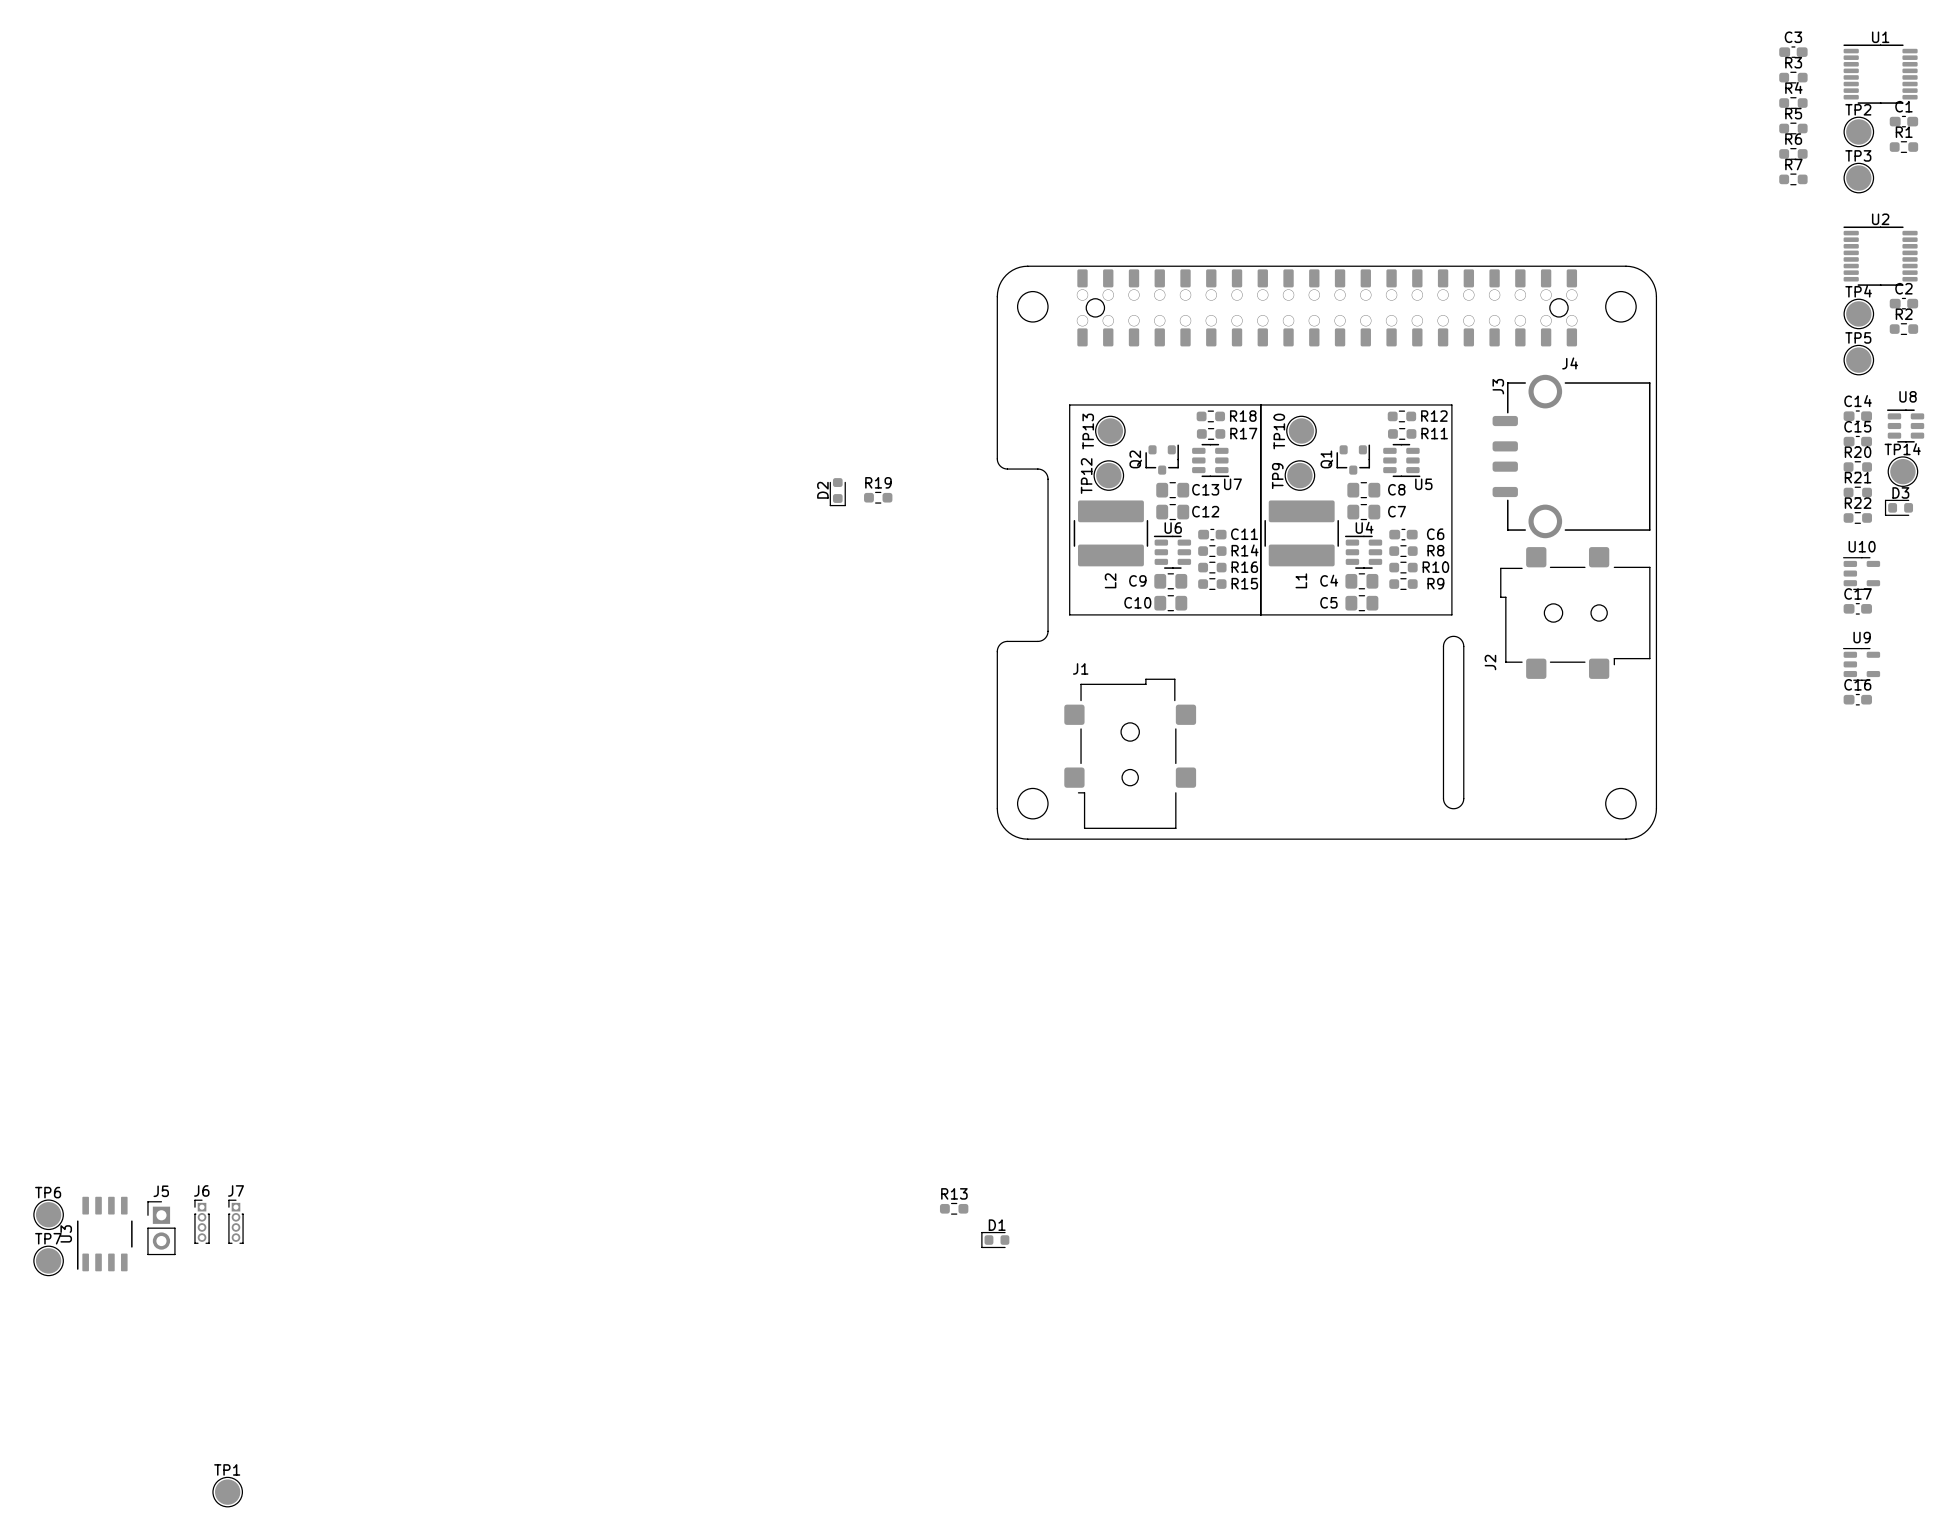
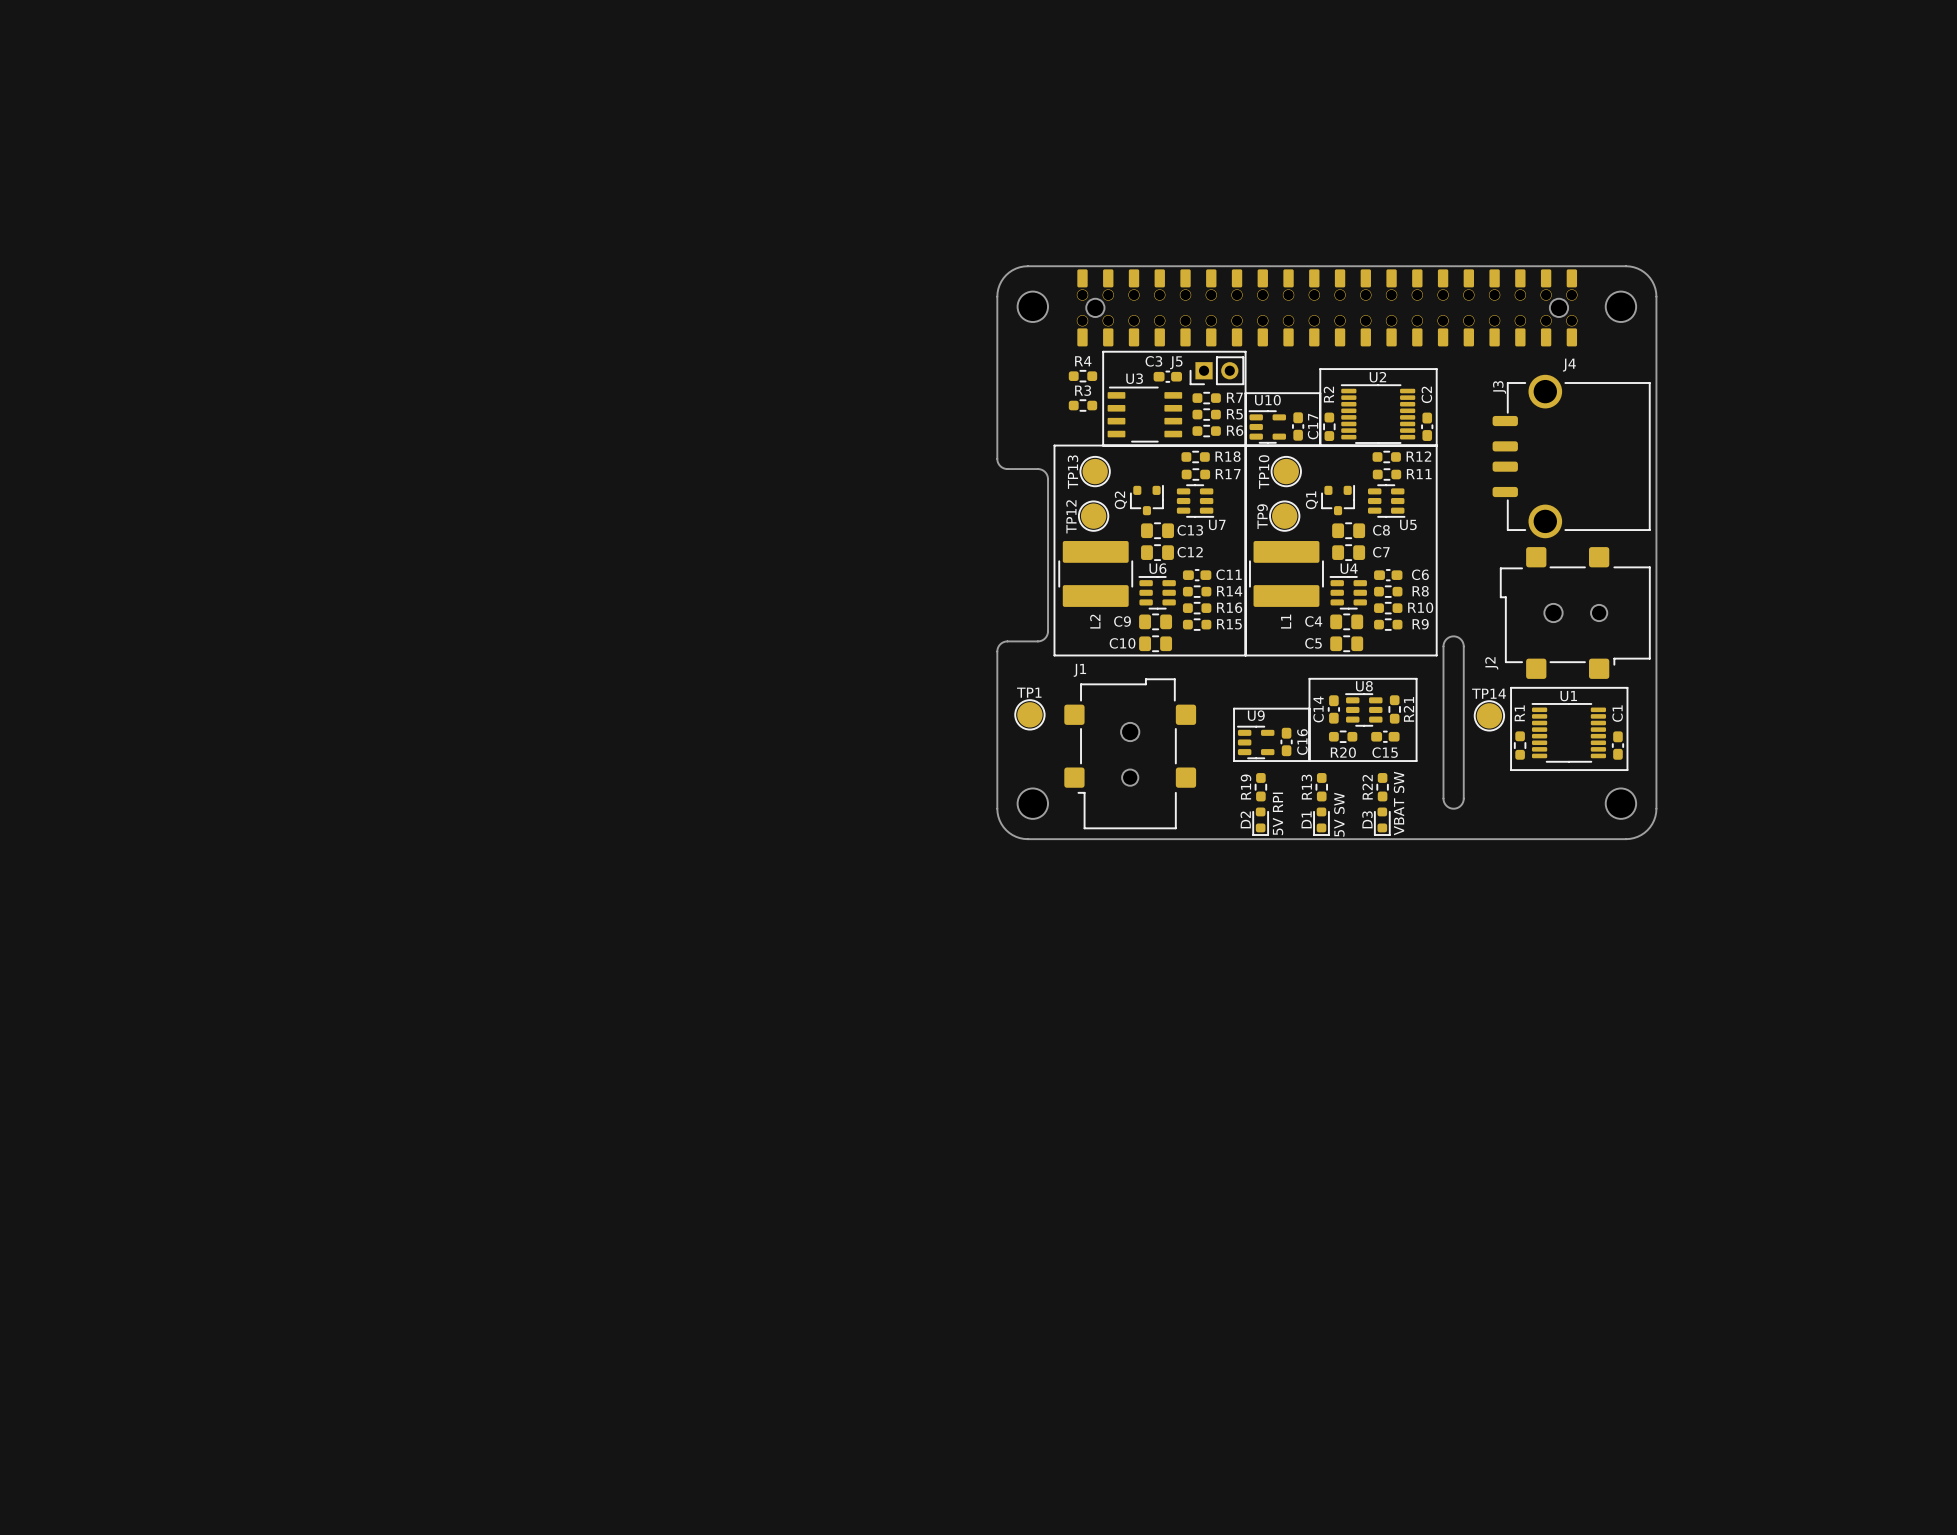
C3 name position: C3 (1793, 37) -> C3 (1153, 361)
C3 position: (1793, 52) -> (1167, 376)
U1 position: (1880, 74) -> (1568, 732)
R3 position: (1793, 77) -> (1082, 405)
R4 position: (1793, 103) -> (1082, 376)
R5 name position: R5 (1793, 113) -> R5 (1234, 414)
C1 rotation: 0° (1903, 121) -> 90° clockwise (1617, 745)
C1 position: (1903, 121) -> (1617, 745)
R5 position: (1793, 128) -> (1206, 414)
TP2: (1858, 131) -> none
R6 name position: R6 (1793, 139) -> R6 (1235, 430)
R1 rotation: 0° (1903, 147) -> 90° clockwise (1520, 745)
R1 position: (1903, 147) -> (1520, 745)
R6 position: (1793, 153) -> (1206, 431)
R7 name position: R7 (1793, 164) -> R7 (1234, 397)
TP3: (1858, 178) -> none
R7 position: (1793, 179) -> (1206, 398)
U2 position: (1880, 256) -> (1378, 414)
C2 rotation: 0° (1903, 303) -> 90° clockwise (1427, 426)
C2 position: (1903, 303) -> (1427, 426)
TP4: (1858, 313) -> none
R2 rotation: 0° (1903, 329) -> 90° clockwise (1329, 426)
R2 position: (1903, 329) -> (1329, 426)
TP5: (1858, 360) -> none
line: none -> (1245, 393) (1320, 393)
U8 name position: U8 (1908, 396) -> U8 (1364, 686)
C14 name position: C14 (1858, 401) -> C14 (1318, 709)
line: (1069, 404) (1451, 404) (1451, 614) (1069, 614) (1069, 404) -> none
line: (1260, 404) (1260, 614) -> none
R18 position: (1210, 416) -> (1195, 456)
R12 position: (1401, 416) -> (1386, 456)
C14 rotation: 0° (1857, 416) -> 90° clockwise (1333, 709)
C14 position: (1857, 416) -> (1333, 709)
C15 name position: C15 (1857, 426) -> C15 (1385, 752)
U8 position: (1905, 426) -> (1363, 709)
TP13 position: (1110, 431) -> (1095, 471)
TP10 position: (1301, 431) -> (1286, 471)
R17 position: (1211, 433) -> (1195, 474)
R11 position: (1402, 433) -> (1386, 474)
C15 position: (1857, 441) -> (1385, 736)
line: none -> (1103, 445) (1103, 351) (1245, 351) (1245, 655)
line: none -> (1320, 445) (1320, 369) (1436, 369) (1436, 655) (1054, 655) (1054, 445) (1436, 445)
R20 name position: R20 (1858, 452) -> R20 (1343, 752)
Q2 position: (1162, 459) -> (1146, 500)
Q1 position: (1353, 459) -> (1338, 500)
U7 position: (1210, 460) -> (1195, 501)
U5 position: (1401, 460) -> (1386, 501)
R20 position: (1857, 467) -> (1343, 736)
TP14 position: (1902, 471) -> (1489, 715)
TP12 position: (1108, 475) -> (1093, 516)
TP9 position: (1299, 475) -> (1284, 516)
R19 name position: R19 (878, 482) -> R19 (1246, 787)
C13 position: (1172, 490) -> (1157, 530)
C8 position: (1363, 490) -> (1348, 530)
D2 position: (837, 492) -> (1260, 821)
R21 rotation: 0° (1857, 492) -> 90° clockwise (1394, 709)
R21 position: (1857, 492) -> (1394, 709)
R19 rotation: 0° (878, 497) -> 90° clockwise (1260, 787)
R19 position: (878, 497) -> (1260, 787)
R22 name position: R22 (1858, 503) -> R22 (1367, 787)
D3 rotation: 0° (1898, 507) -> 90° counterclockwise (1382, 821)
D3 position: (1898, 507) -> (1382, 821)
C12 position: (1172, 512) -> (1157, 552)
C7 position: (1363, 512) -> (1348, 552)
R22 rotation: 0° (1857, 517) -> 90° clockwise (1382, 787)
R22 position: (1857, 517) -> (1382, 787)
L2 position: (1110, 533) -> (1095, 573)
L1 position: (1301, 533) -> (1286, 573)
C11 position: (1212, 534) -> (1197, 575)
C6 position: (1403, 534) -> (1388, 575)
R14 position: (1212, 551) -> (1197, 591)
R8 position: (1403, 551) -> (1388, 591)
U6 position: (1172, 552) -> (1157, 592)
U4 position: (1363, 552) -> (1348, 592)
R16 position: (1212, 567) -> (1197, 608)
R10 position: (1403, 567) -> (1388, 608)
U10 position: (1861, 573) -> (1267, 427)
C9 position: (1170, 581) -> (1155, 621)
C4 position: (1361, 581) -> (1346, 621)
R15 position: (1212, 584) -> (1197, 624)
R9 position: (1403, 584) -> (1388, 624)
C10 position: (1170, 603) -> (1155, 643)
C5 position: (1361, 603) -> (1346, 643)
C17 rotation: 0° (1857, 608) -> 90° clockwise (1298, 426)
C17 position: (1857, 608) -> (1298, 426)
U9 position: (1861, 664) -> (1255, 742)
line: none -> (1511, 687) (1627, 687) (1627, 770) (1511, 770) (1511, 687)
C16 rotation: 0° (1857, 699) -> 90° clockwise (1286, 741)
C16 position: (1857, 699) -> (1286, 741)
line: none -> (1309, 708) (1234, 708) (1234, 761) (1416, 761) (1416, 678) (1309, 678) (1309, 761)
text: none -> VBAT SW (1399, 803)
text: none -> 5V RPI (1278, 813)
text: none -> 5V SW (1339, 814)
R13 name position: R13 (954, 1193) -> R13 (1306, 787)
R13 rotation: 0° (954, 1208) -> 90° clockwise (1321, 787)
R13 position: (954, 1208) -> (1321, 787)
TP6: (48, 1214) -> none
J6: (202, 1221) -> none
J7: (235, 1221) -> none
J5 rotation: 0° (161, 1228) -> 90° counterclockwise (1216, 370)
J5 position: (161, 1228) -> (1216, 370)
U3 rotation: 0° (104, 1234) -> 90° clockwise (1144, 414)
U3 position: (104, 1234) -> (1144, 414)
D1 rotation: 0° (995, 1240) -> 90° counterclockwise (1321, 821)
D1 position: (995, 1240) -> (1321, 821)
TP7: (48, 1260) -> none
TP1 position: (227, 1492) -> (1029, 714)

